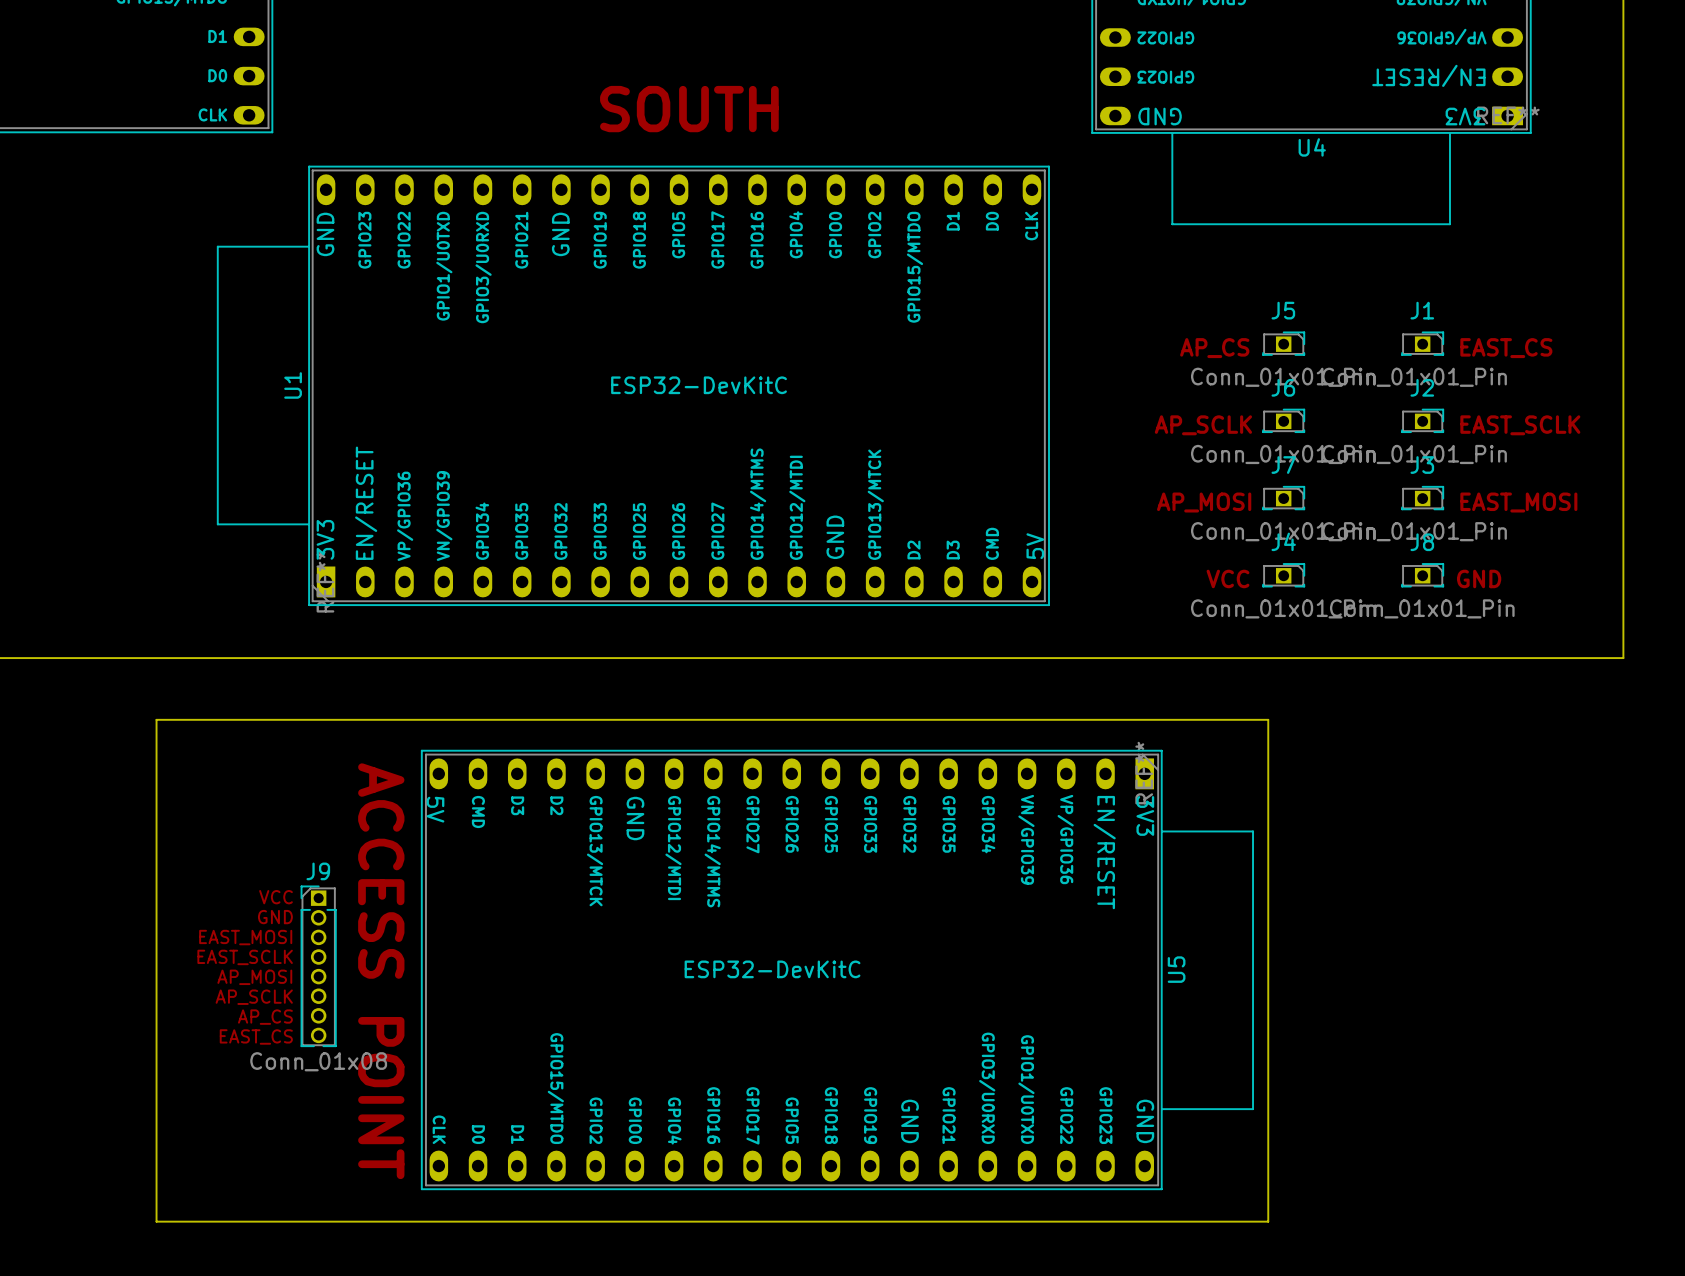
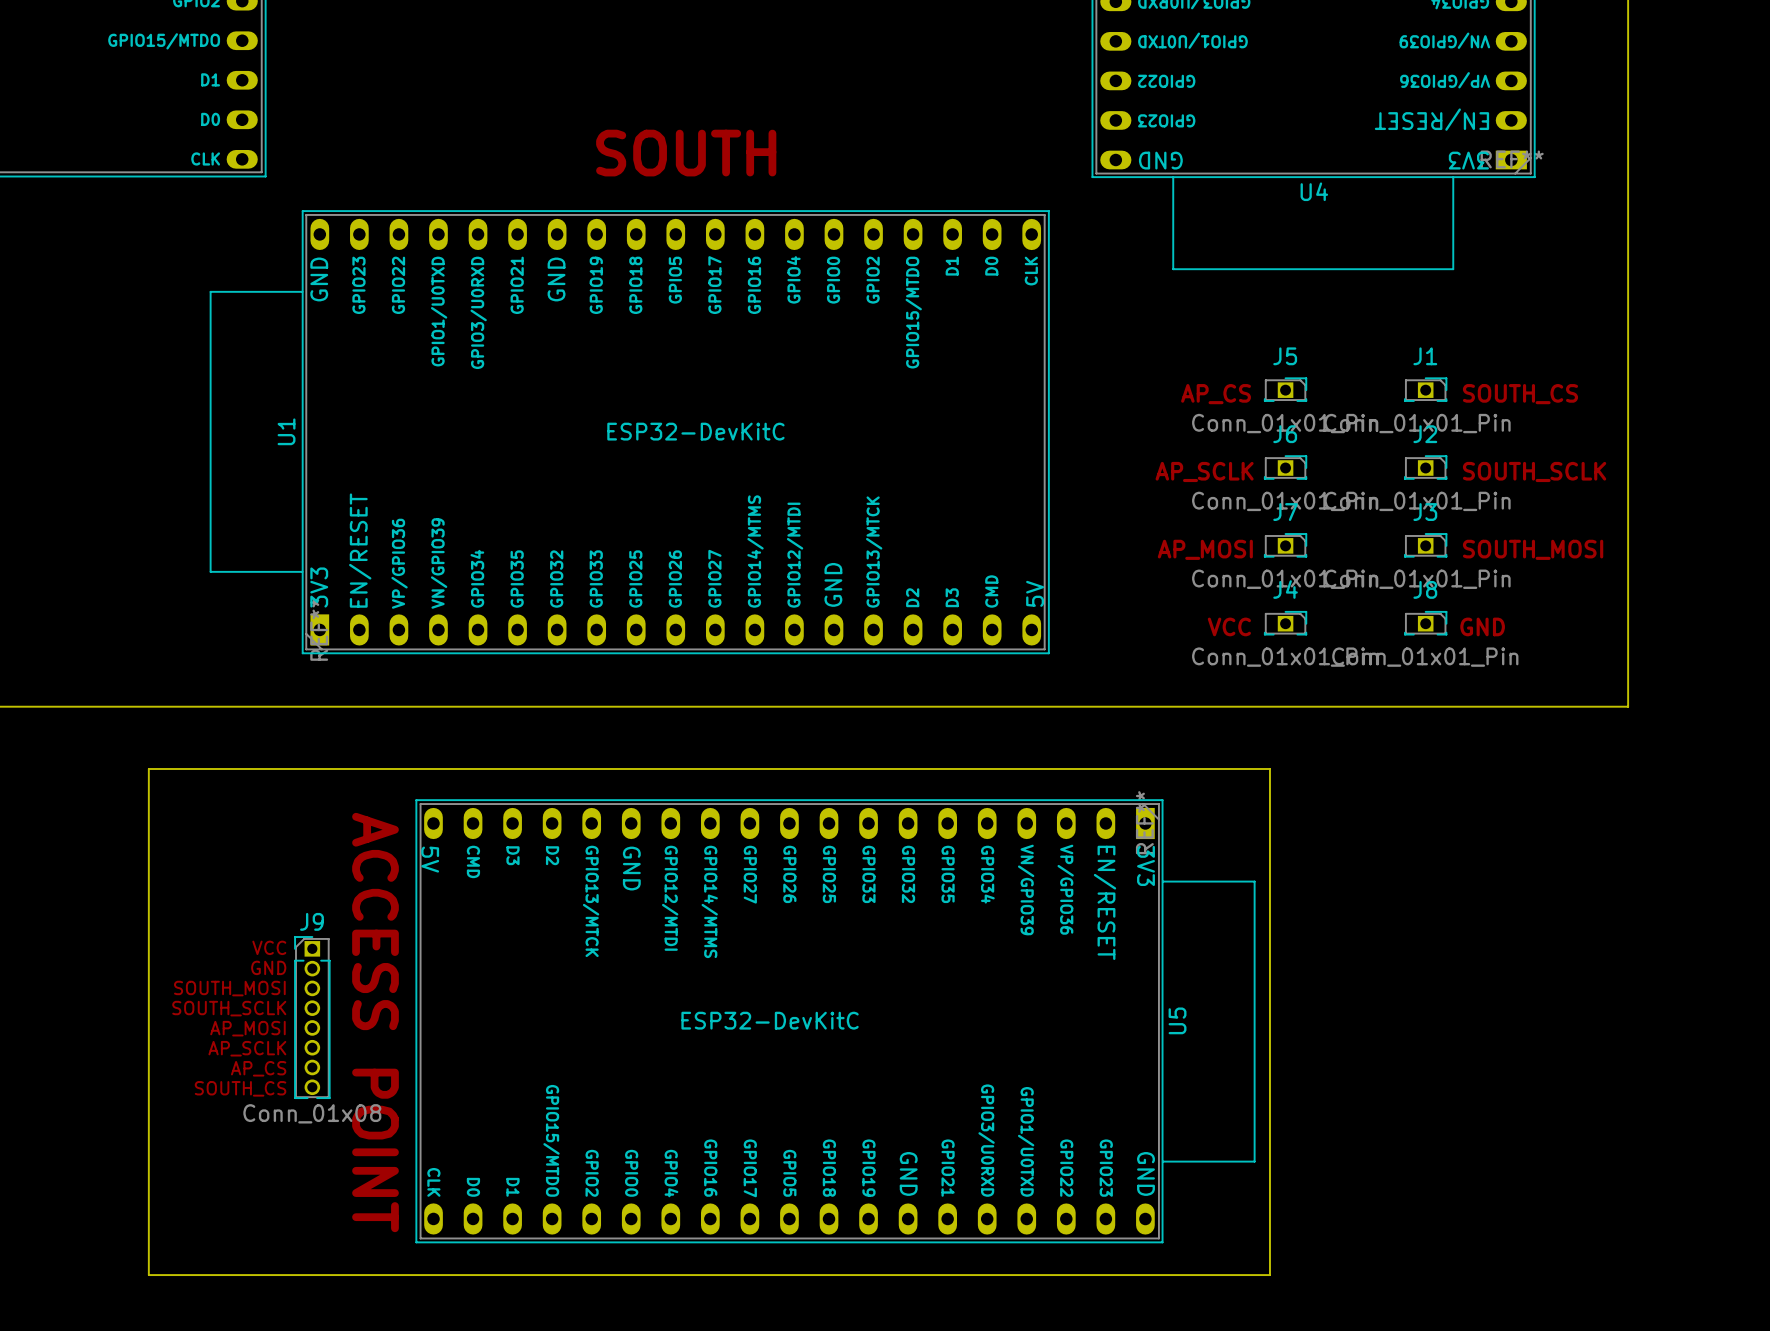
text: EAST_CS (1506, 348) -> SOUTH_CS (1520, 394)
text: EAST_SCLK (1520, 425) -> SOUTH_SCLK (1534, 471)
text: EAST_MOSI (1518, 502) -> SOUTH_MOSI (1533, 549)
text: EAST_MOSI (245, 937) -> SOUTH_MOSI (229, 988)
text: EAST_SCLK (245, 957) -> SOUTH_SCLK (229, 1008)
text: EAST_CS (256, 1036) -> SOUTH_CS (240, 1088)

